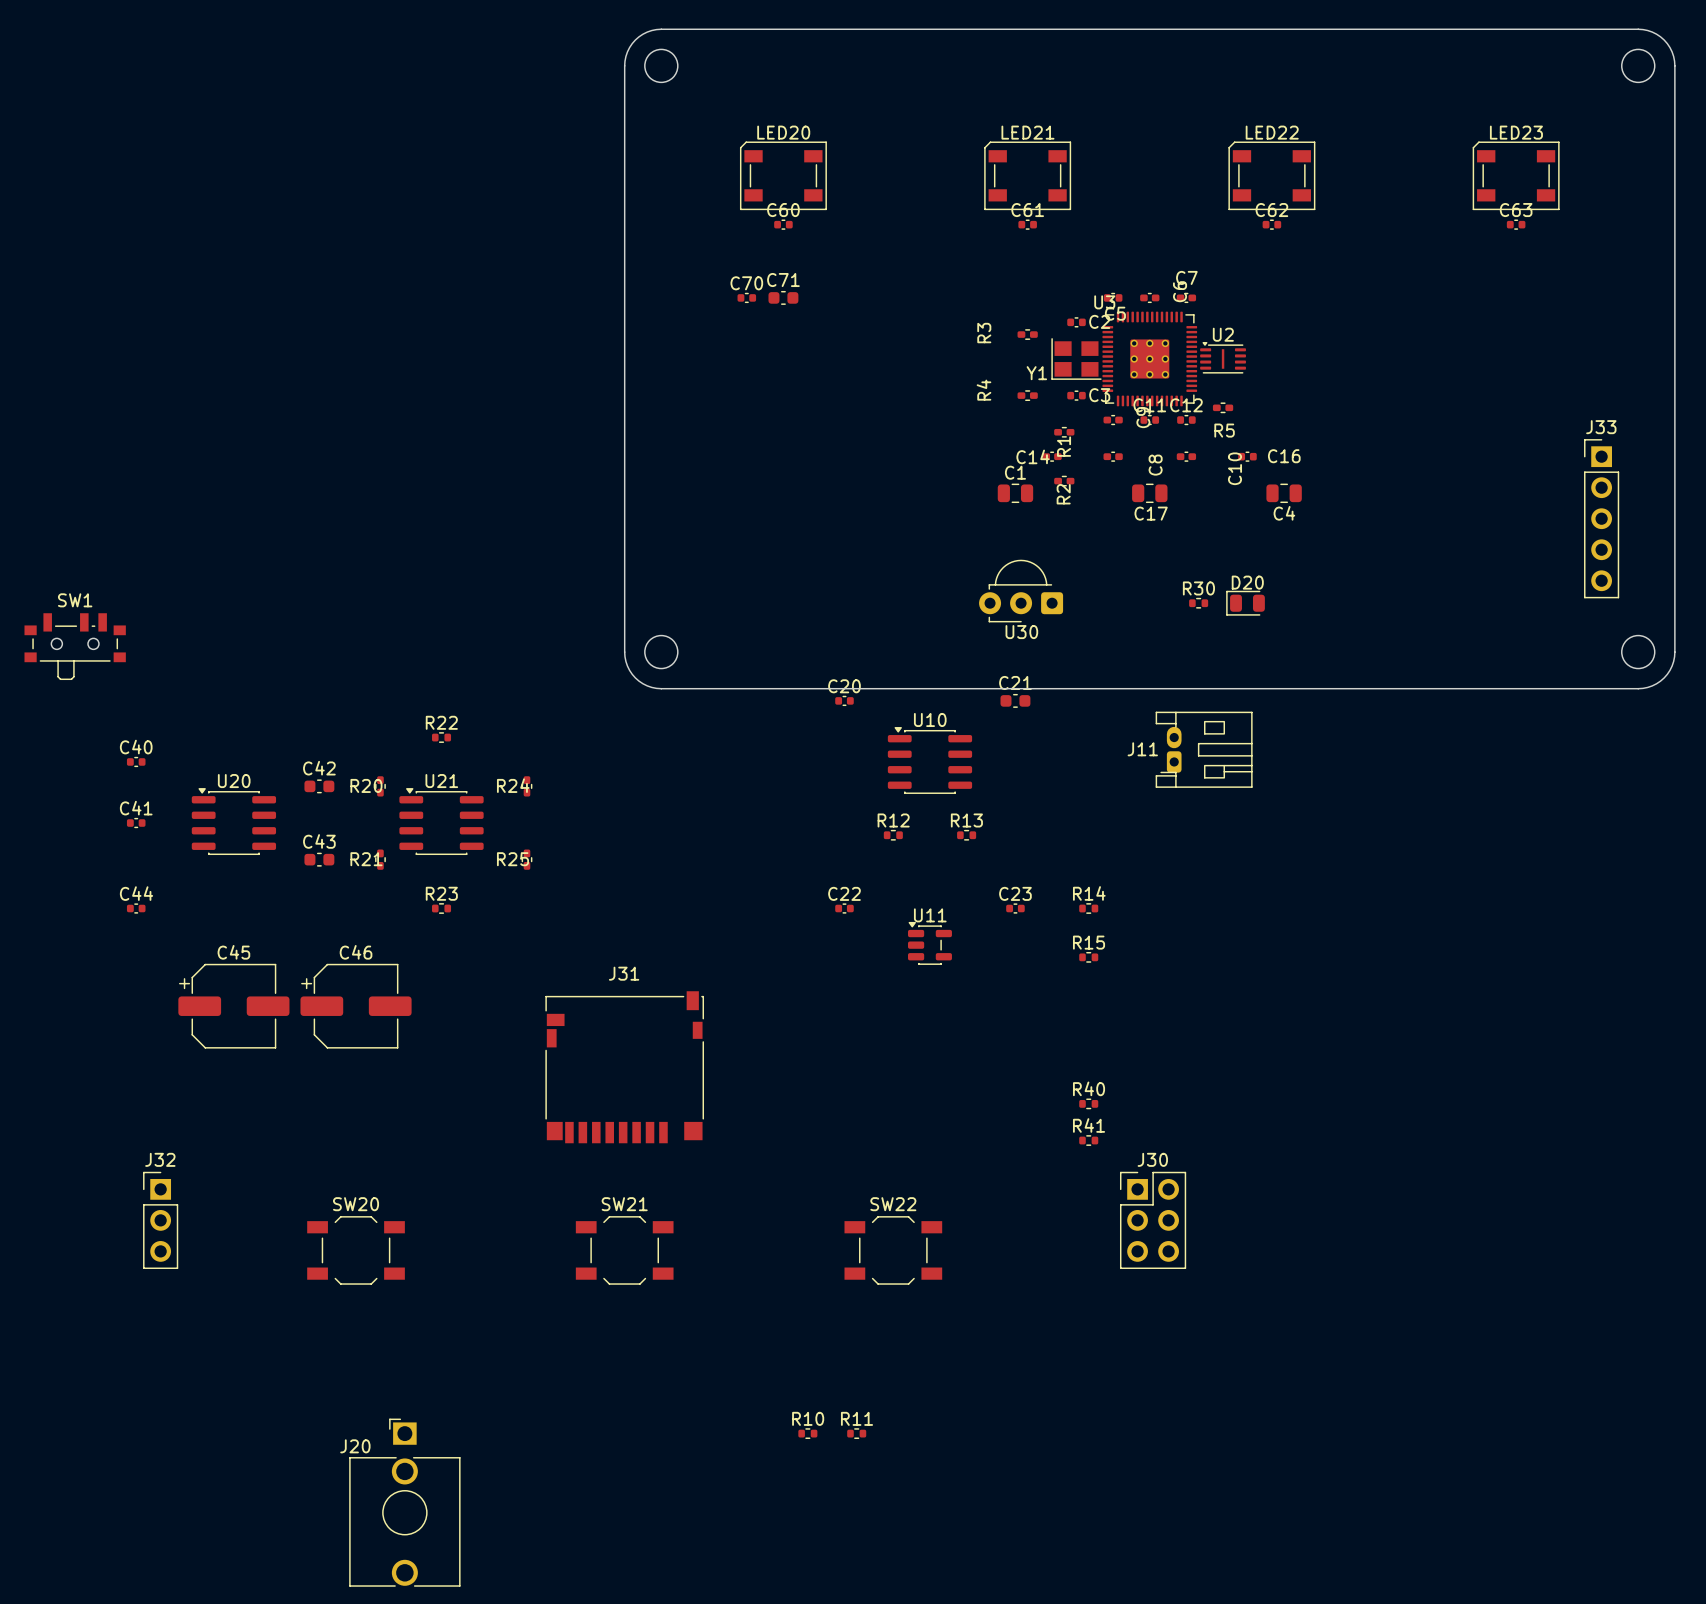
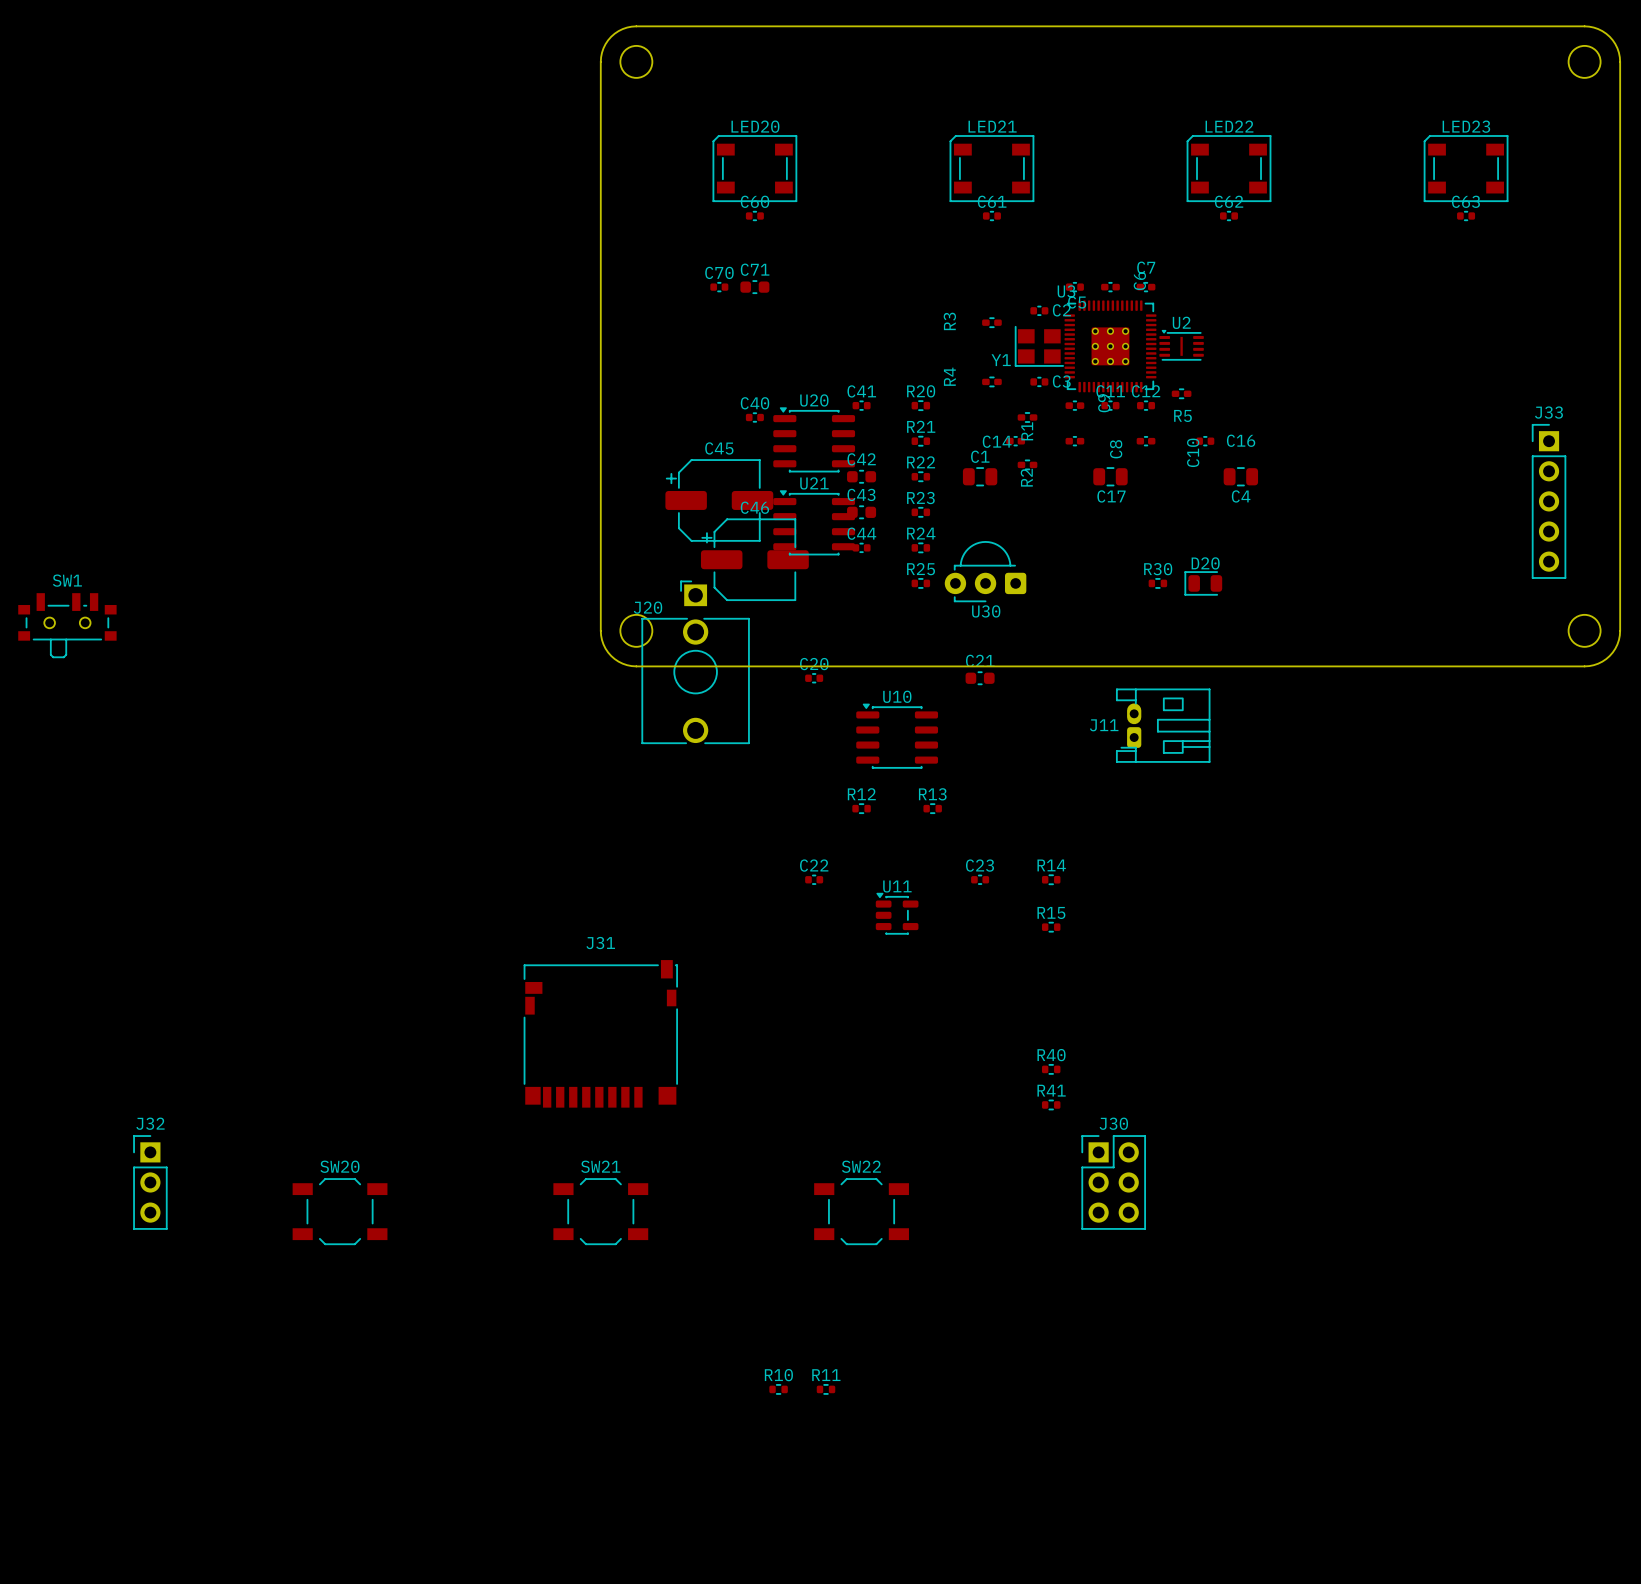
R22 position: (441, 737) -> (920, 476)
C40 position: (136, 761) -> (754, 417)
R20 footprint: [375, 776, 386, 797] -> [911, 400, 931, 411]
R24 footprint: [521, 776, 533, 797] -> [911, 542, 931, 554]
C42 position: (319, 786) -> (861, 476)
U20 position: (233, 821) -> (814, 439)
U21 position: (441, 821) -> (814, 522)
C41 position: (136, 823) -> (861, 405)
R21 footprint: [375, 849, 386, 870] -> [911, 435, 931, 447]
R25 footprint: [521, 849, 533, 870] -> [911, 578, 931, 589]
C43 position: (319, 859) -> (861, 512)
C44 position: (136, 908) -> (861, 547)
R23 position: (441, 908) -> (920, 512)
C45 footprint: [178, 963, 290, 1049] -> [665, 459, 774, 542]
C46 footprint: [300, 963, 412, 1049] -> [700, 518, 809, 601]
J20 position: (404, 1502) -> (695, 662)

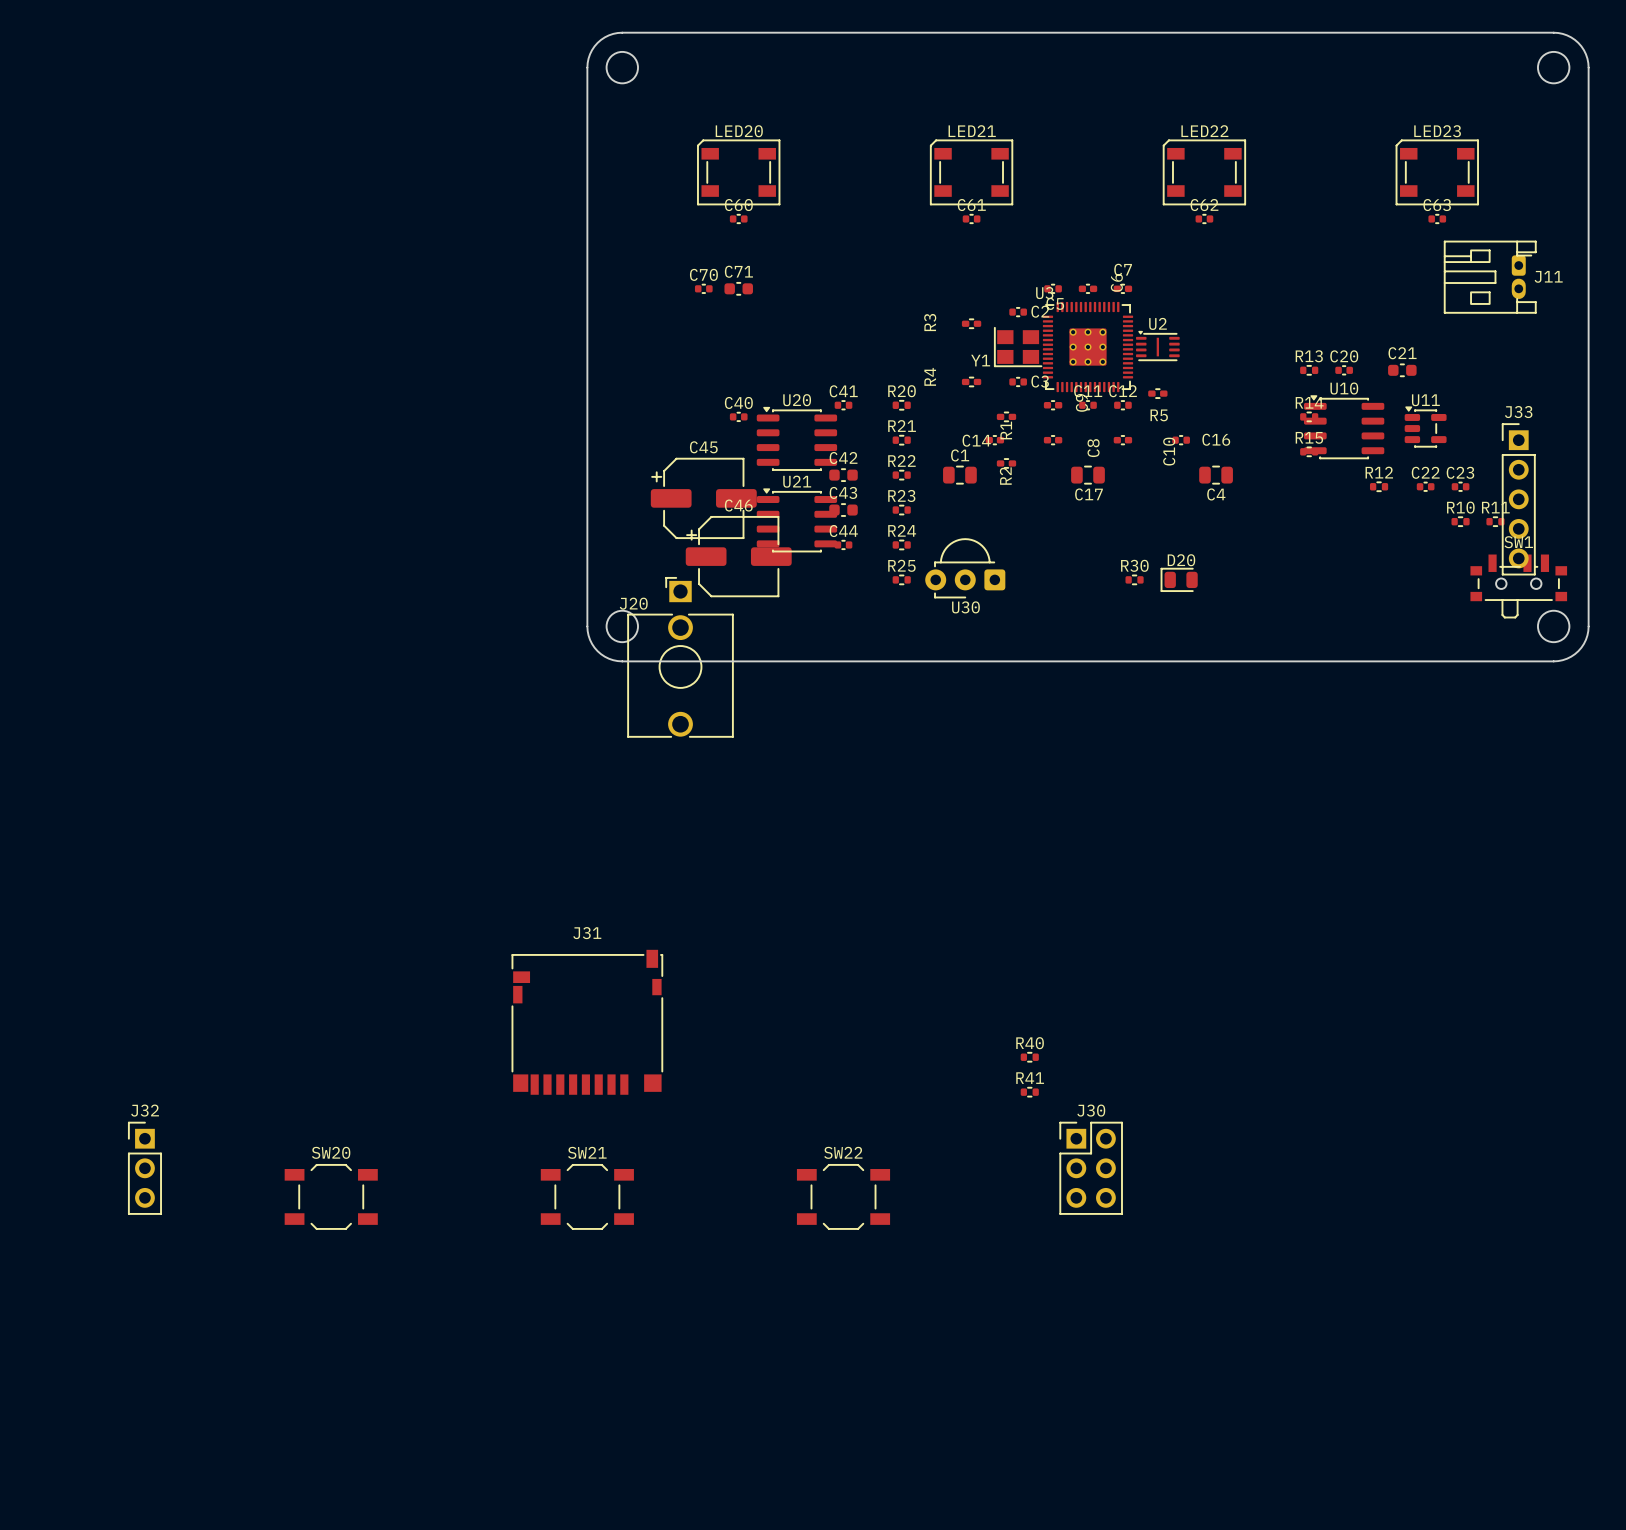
SW1 position: (67, 625) -> (1518, 586)
C20 position: (814, 678) -> (1344, 370)
C21 position: (980, 678) -> (1402, 370)
J11 rotation: 0° (1163, 725) -> 180° (1490, 277)
J11 position: (1163, 725) -> (1490, 277)
U10 position: (897, 736) -> (1344, 427)
R12 position: (861, 808) -> (1379, 486)
R13 position: (932, 808) -> (1309, 370)
C22 position: (814, 879) -> (1425, 486)
C23 position: (980, 879) -> (1460, 486)
R14 position: (1051, 879) -> (1309, 416)
U11 position: (897, 913) -> (1425, 426)
R15 position: (1051, 927) -> (1309, 451)
R10 position: (778, 1389) -> (1460, 521)
R11 position: (826, 1389) -> (1495, 521)

